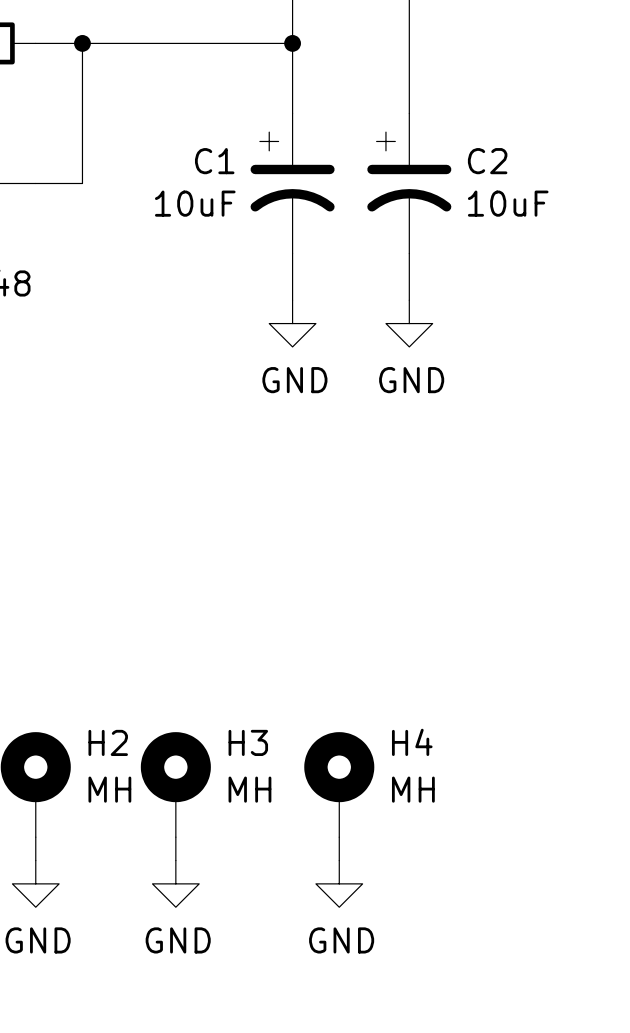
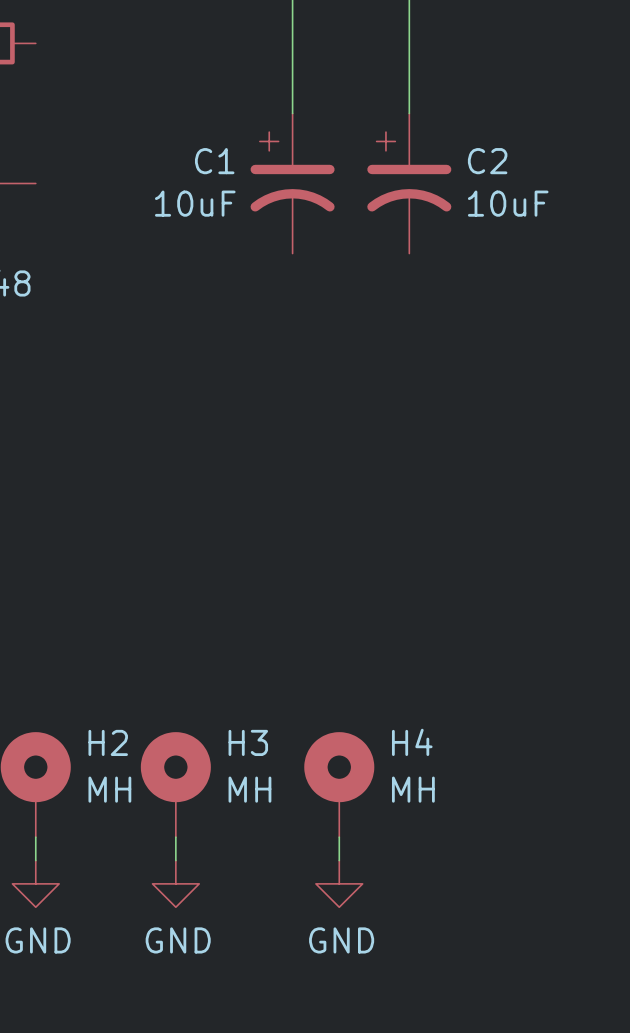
wire: (35, 43) (292, 43) -> none
wire: (82, 43) (82, 183) (35, 183) -> none
junction: (82, 43) -> none
junction: (292, 43) -> none
wire: (292, 253) (292, 300) -> none
wire: (409, 253) (409, 300) -> none
power symbol: GND (292, 323) -> none
power symbol: GND (409, 323) -> none

